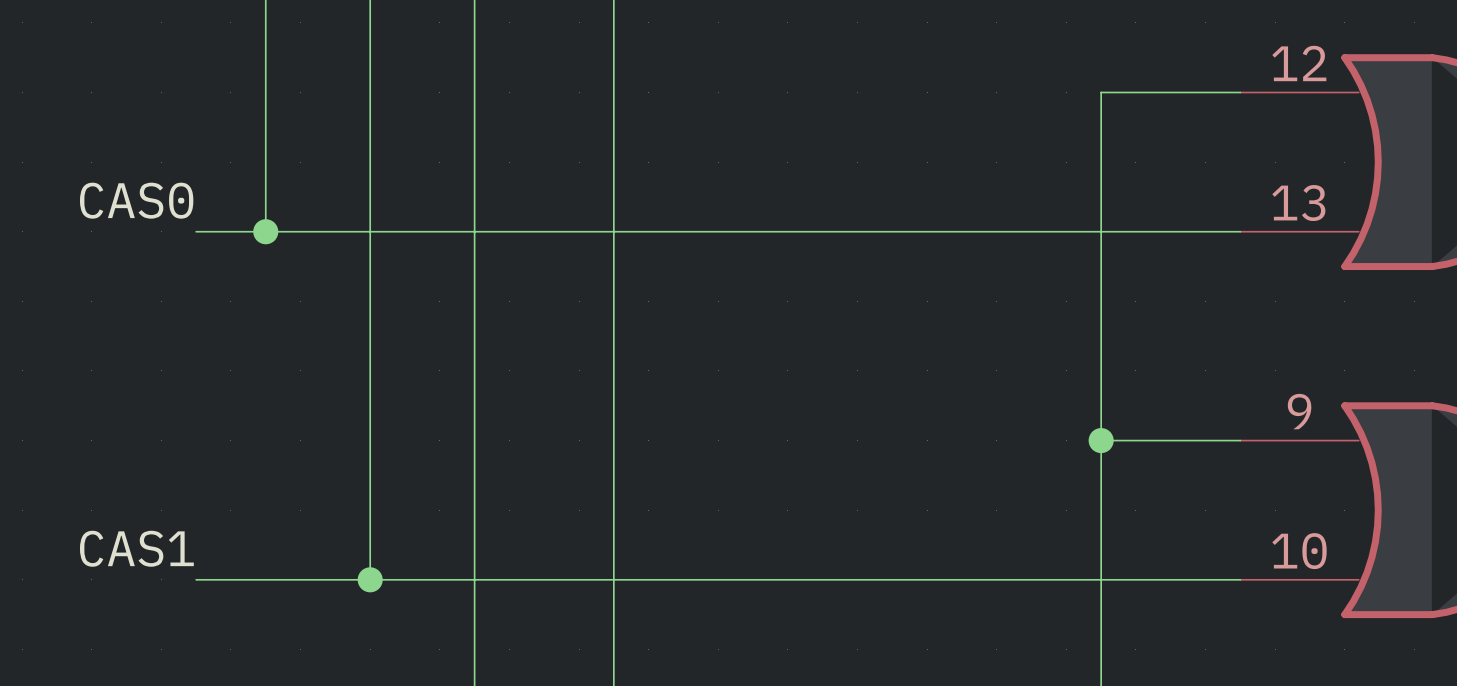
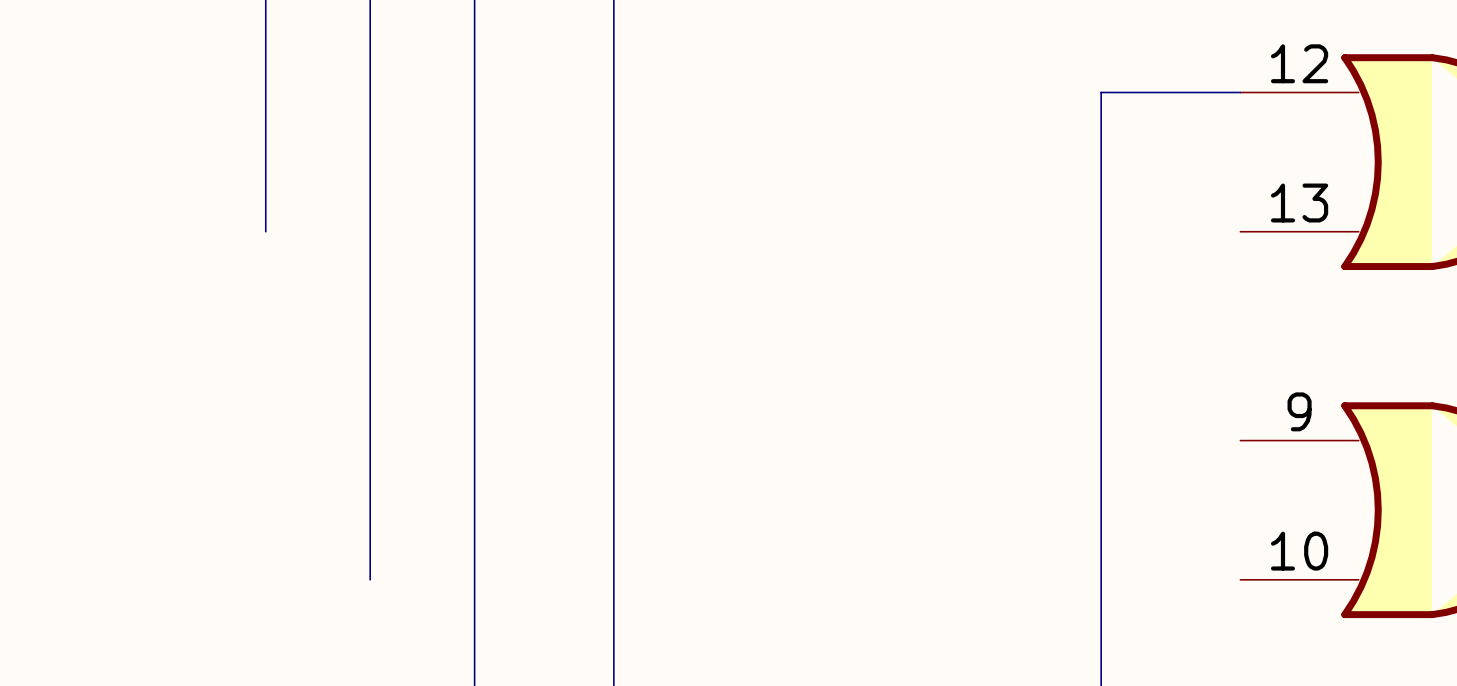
label: CAS0 (136, 200) -> none
wire: (196, 231) (1240, 231) -> none
junction: (265, 231) -> none
wire: (1101, 440) (1240, 440) -> none
junction: (1101, 440) -> none
label: CAS1 (136, 548) -> none
wire: (196, 579) (1240, 579) -> none
junction: (370, 579) -> none

